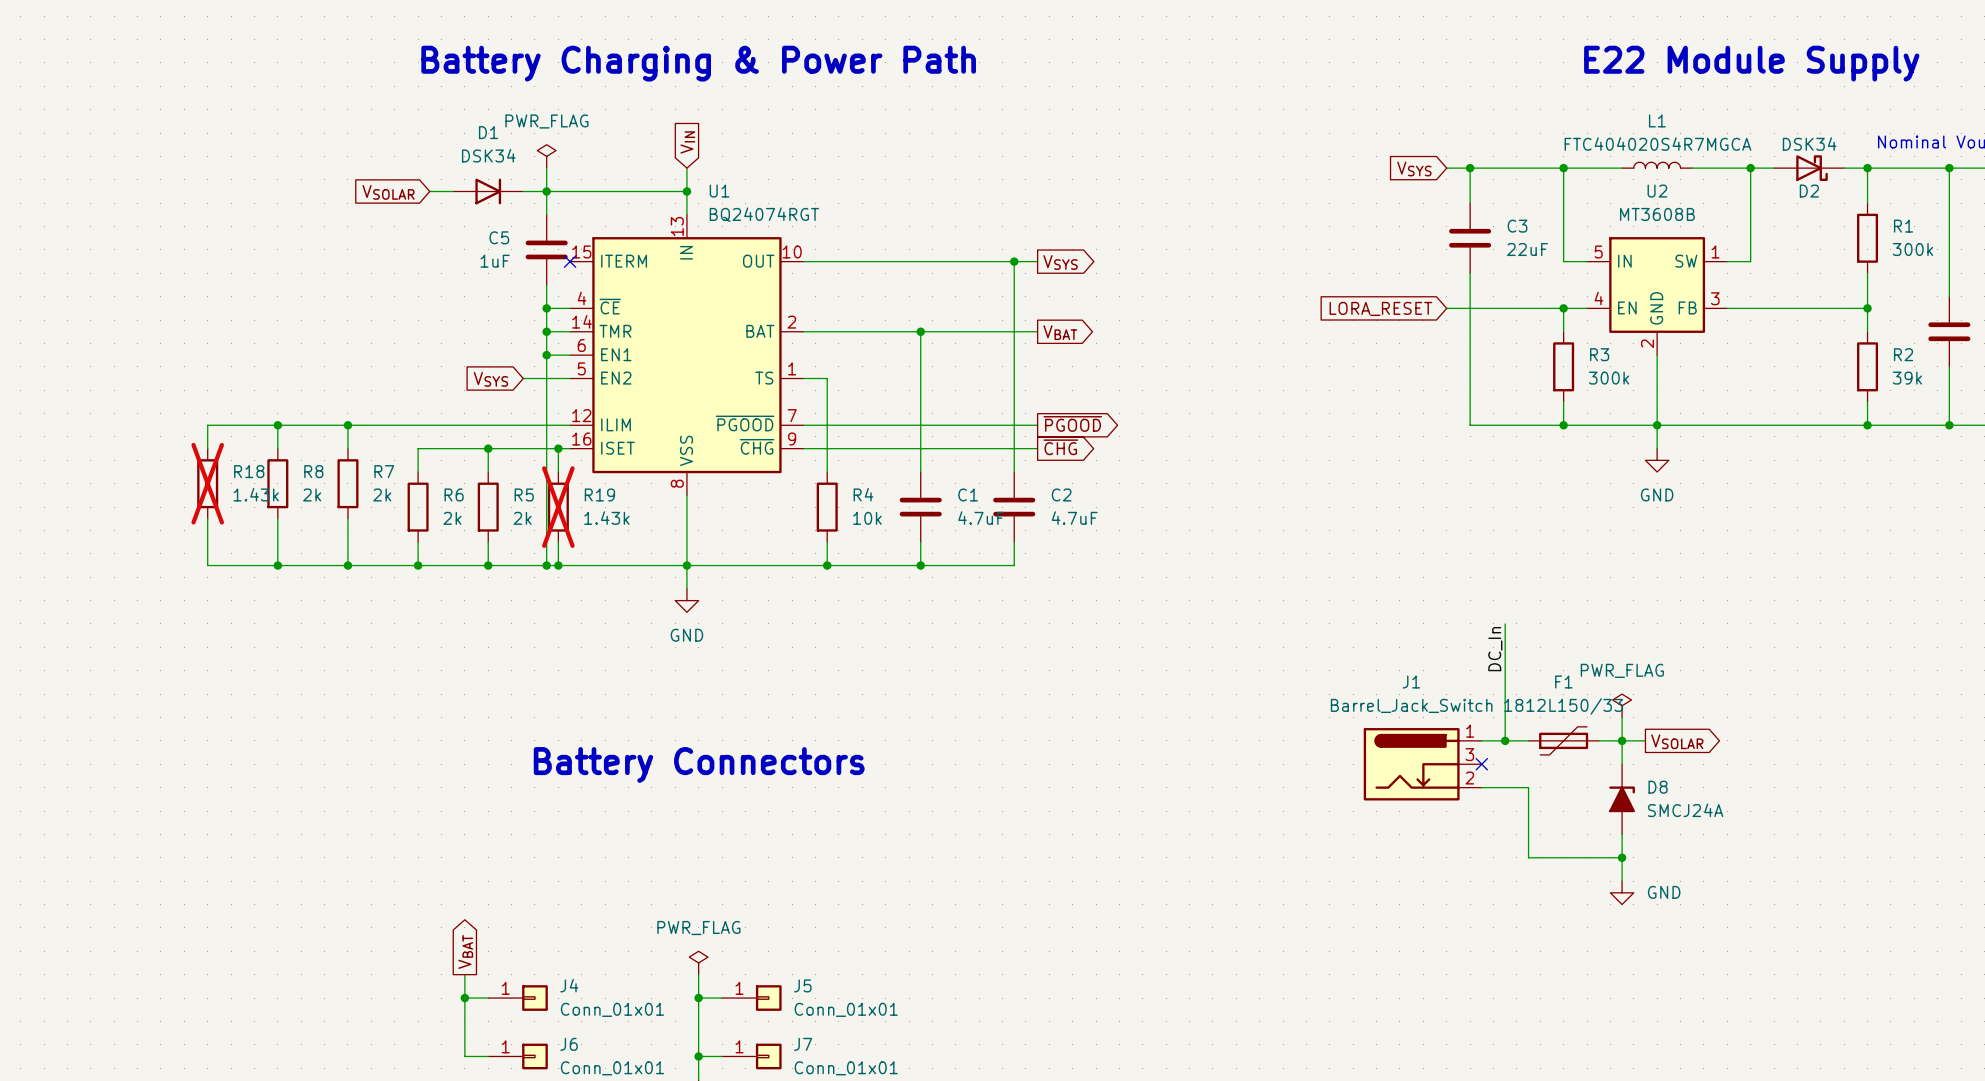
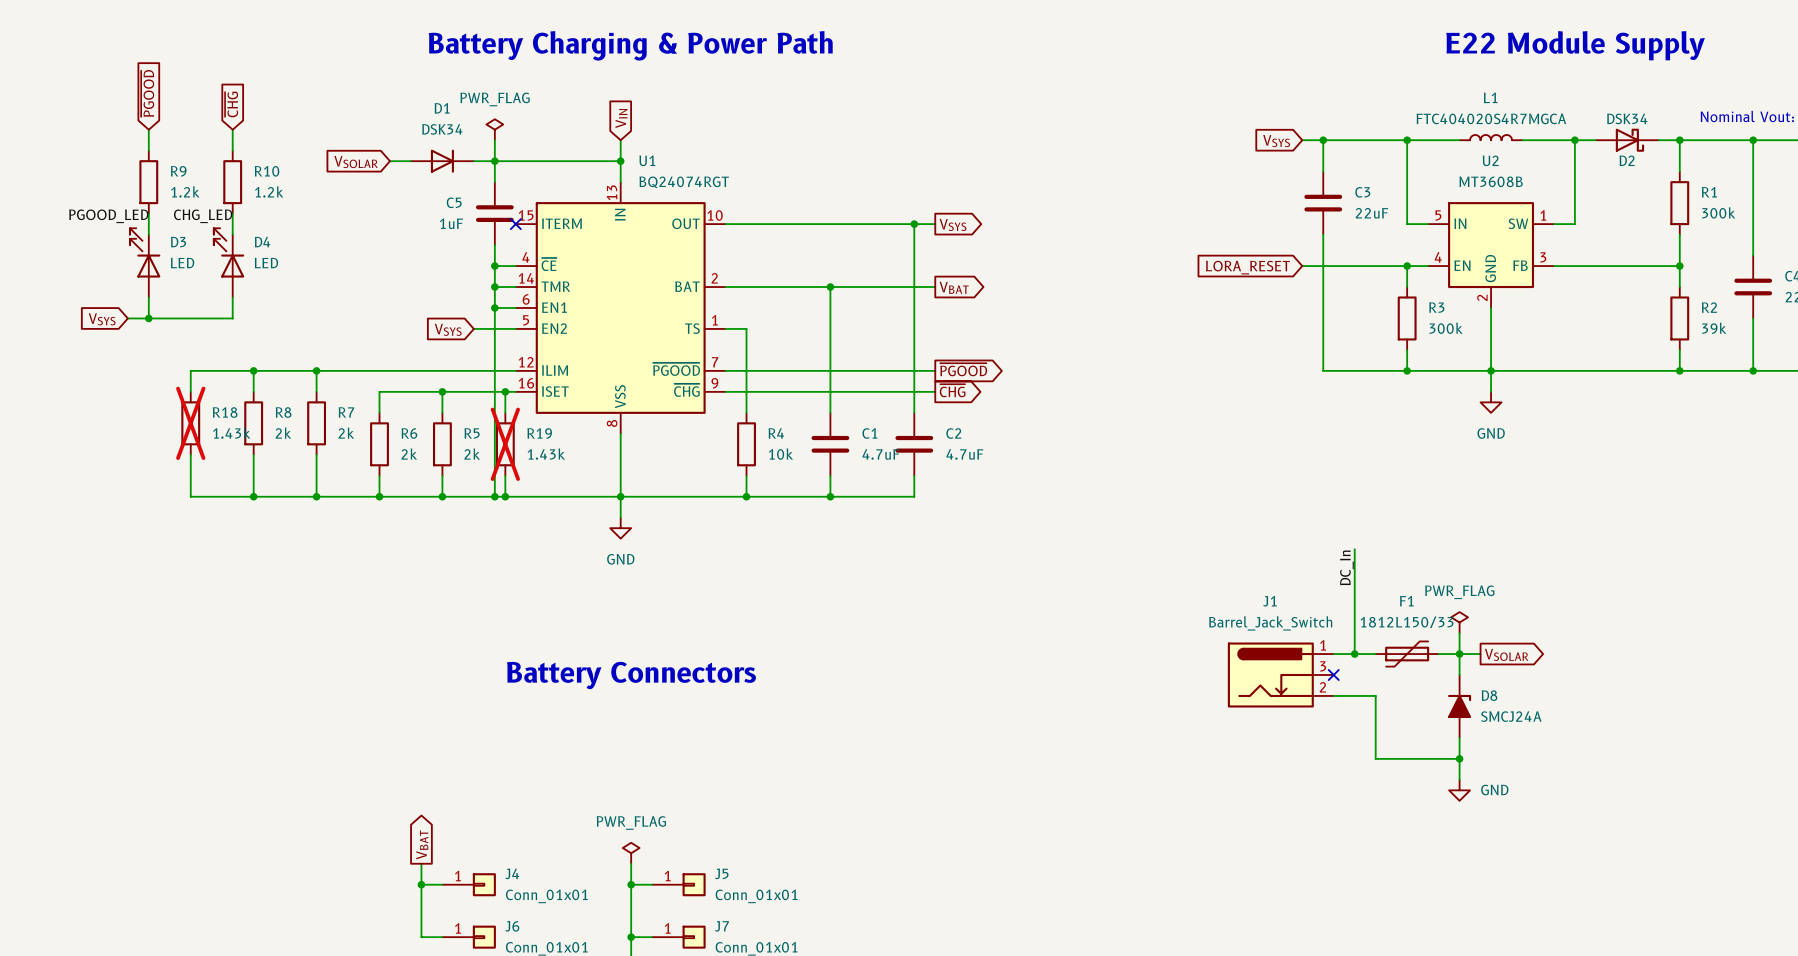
global label: none -> ~{PGOOD} (147, 93)
global label: none -> ~{CHG} (231, 104)
wire: none -> (148, 129) (148, 150)
wire: none -> (232, 129) (232, 150)
R9: none -> 1.2k (148, 182)
R10: none -> 1.2k (232, 182)
wire: none -> (148, 213) (148, 234)
wire: none -> (232, 213) (232, 234)
label: none -> PGOOD_LED (108, 216)
label: none -> CHG_LED (203, 216)
D3: none -> LED (145, 262)
D4: none -> LED (229, 262)
wire: none -> (148, 297) (148, 318)
wire: none -> (232, 297) (232, 318) (127, 318)
junction: none -> (148, 318)
global label: none -> VSYS (102, 319)

